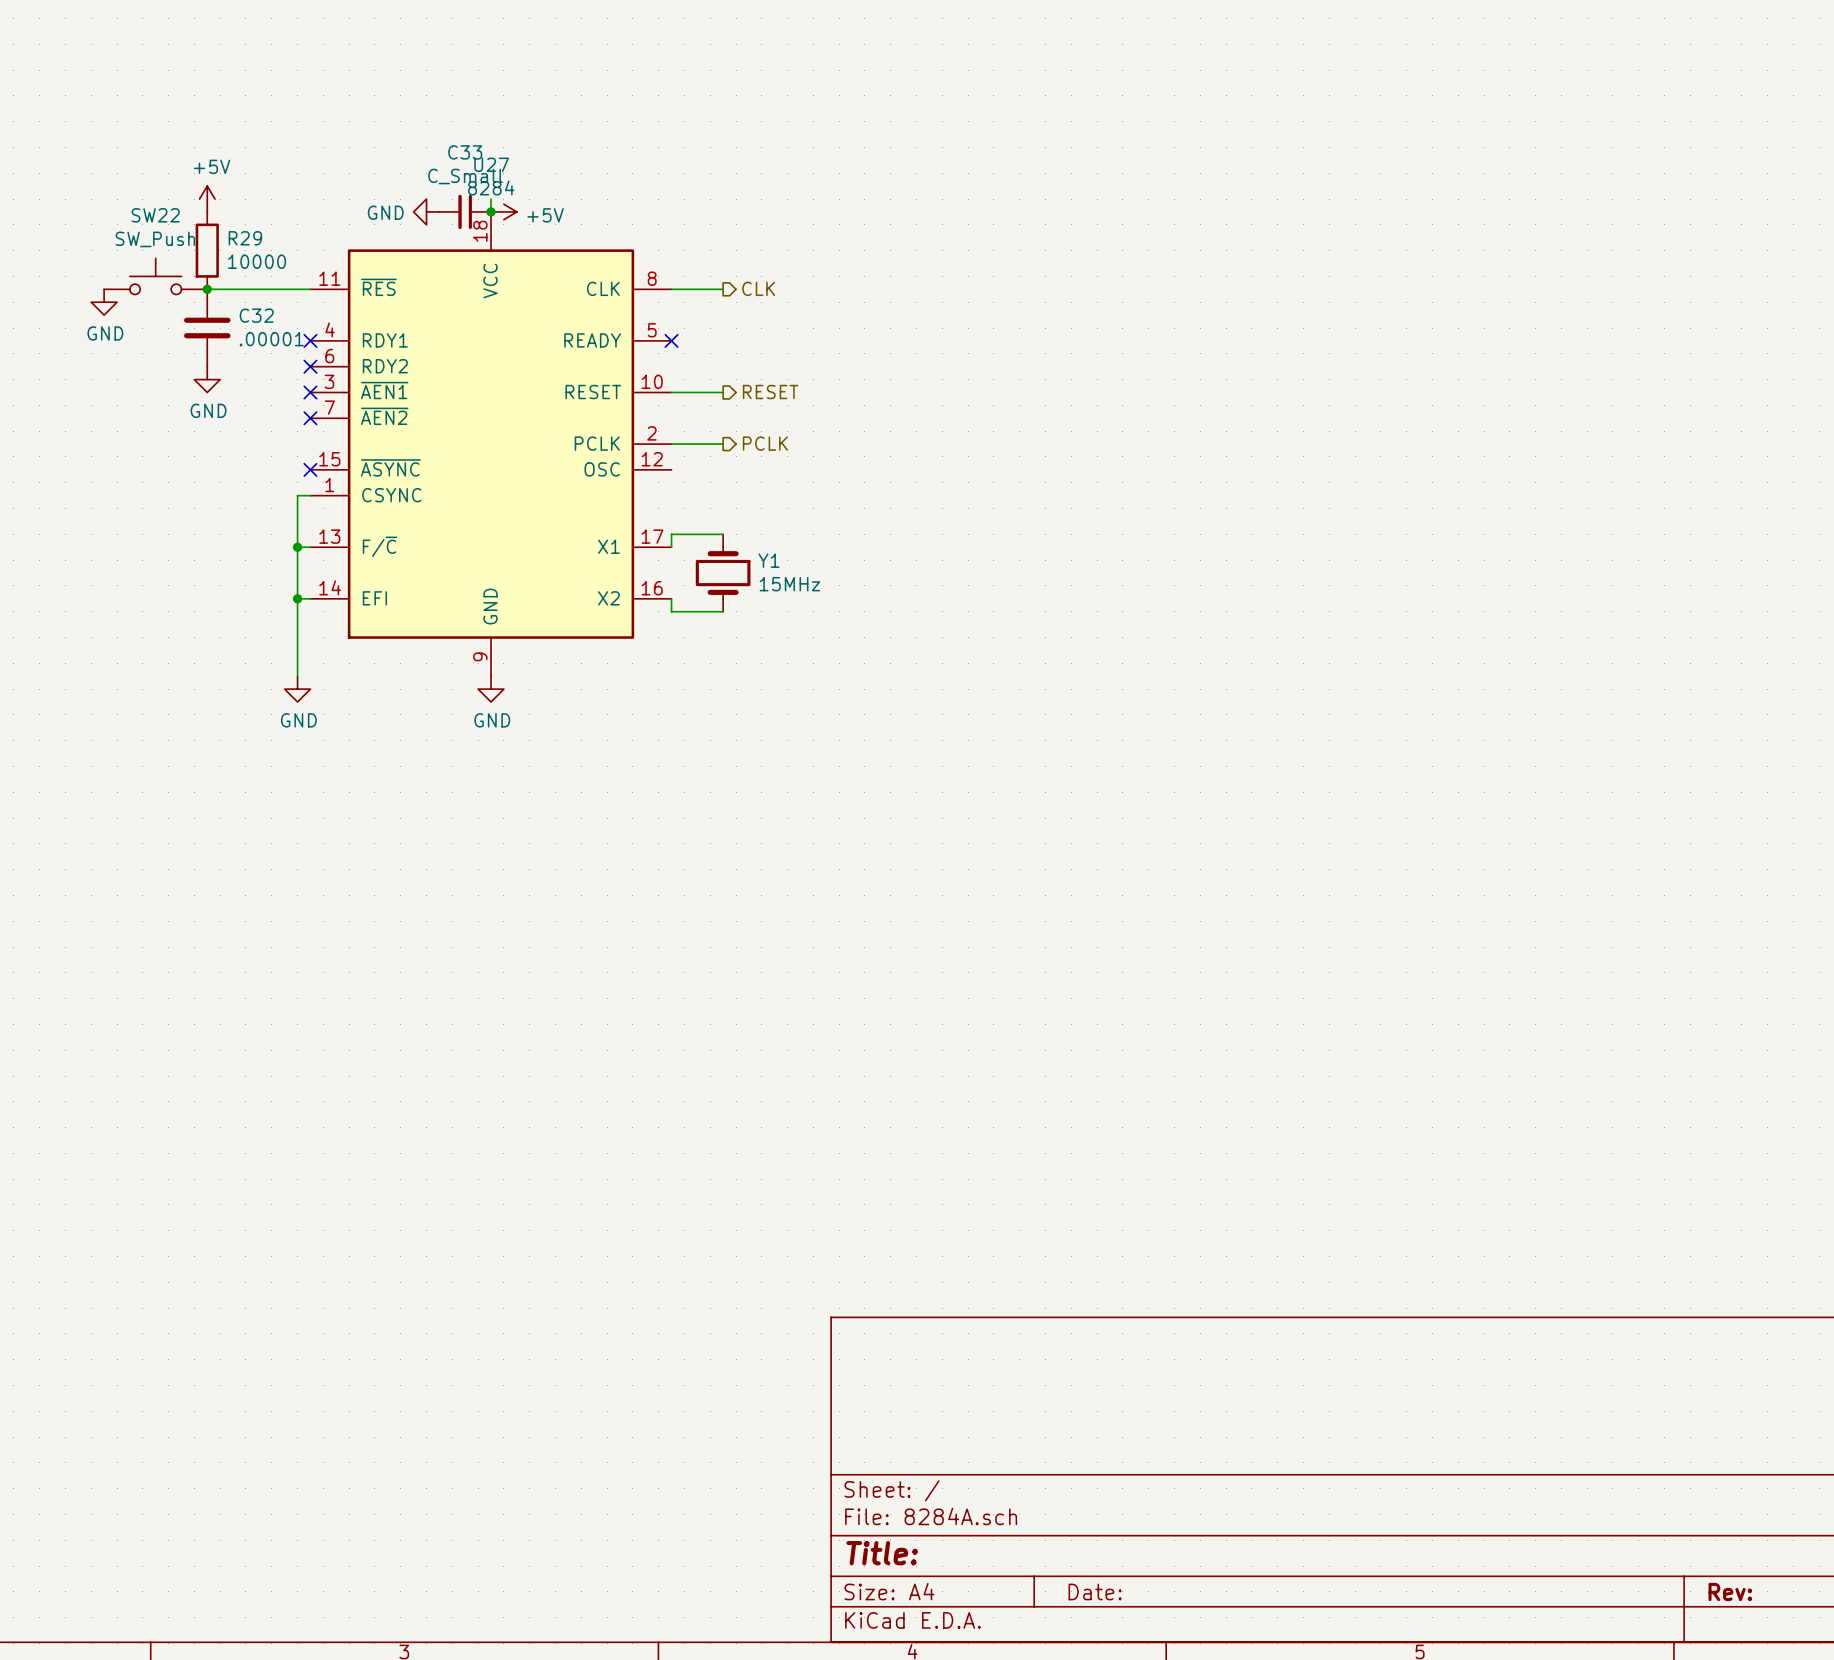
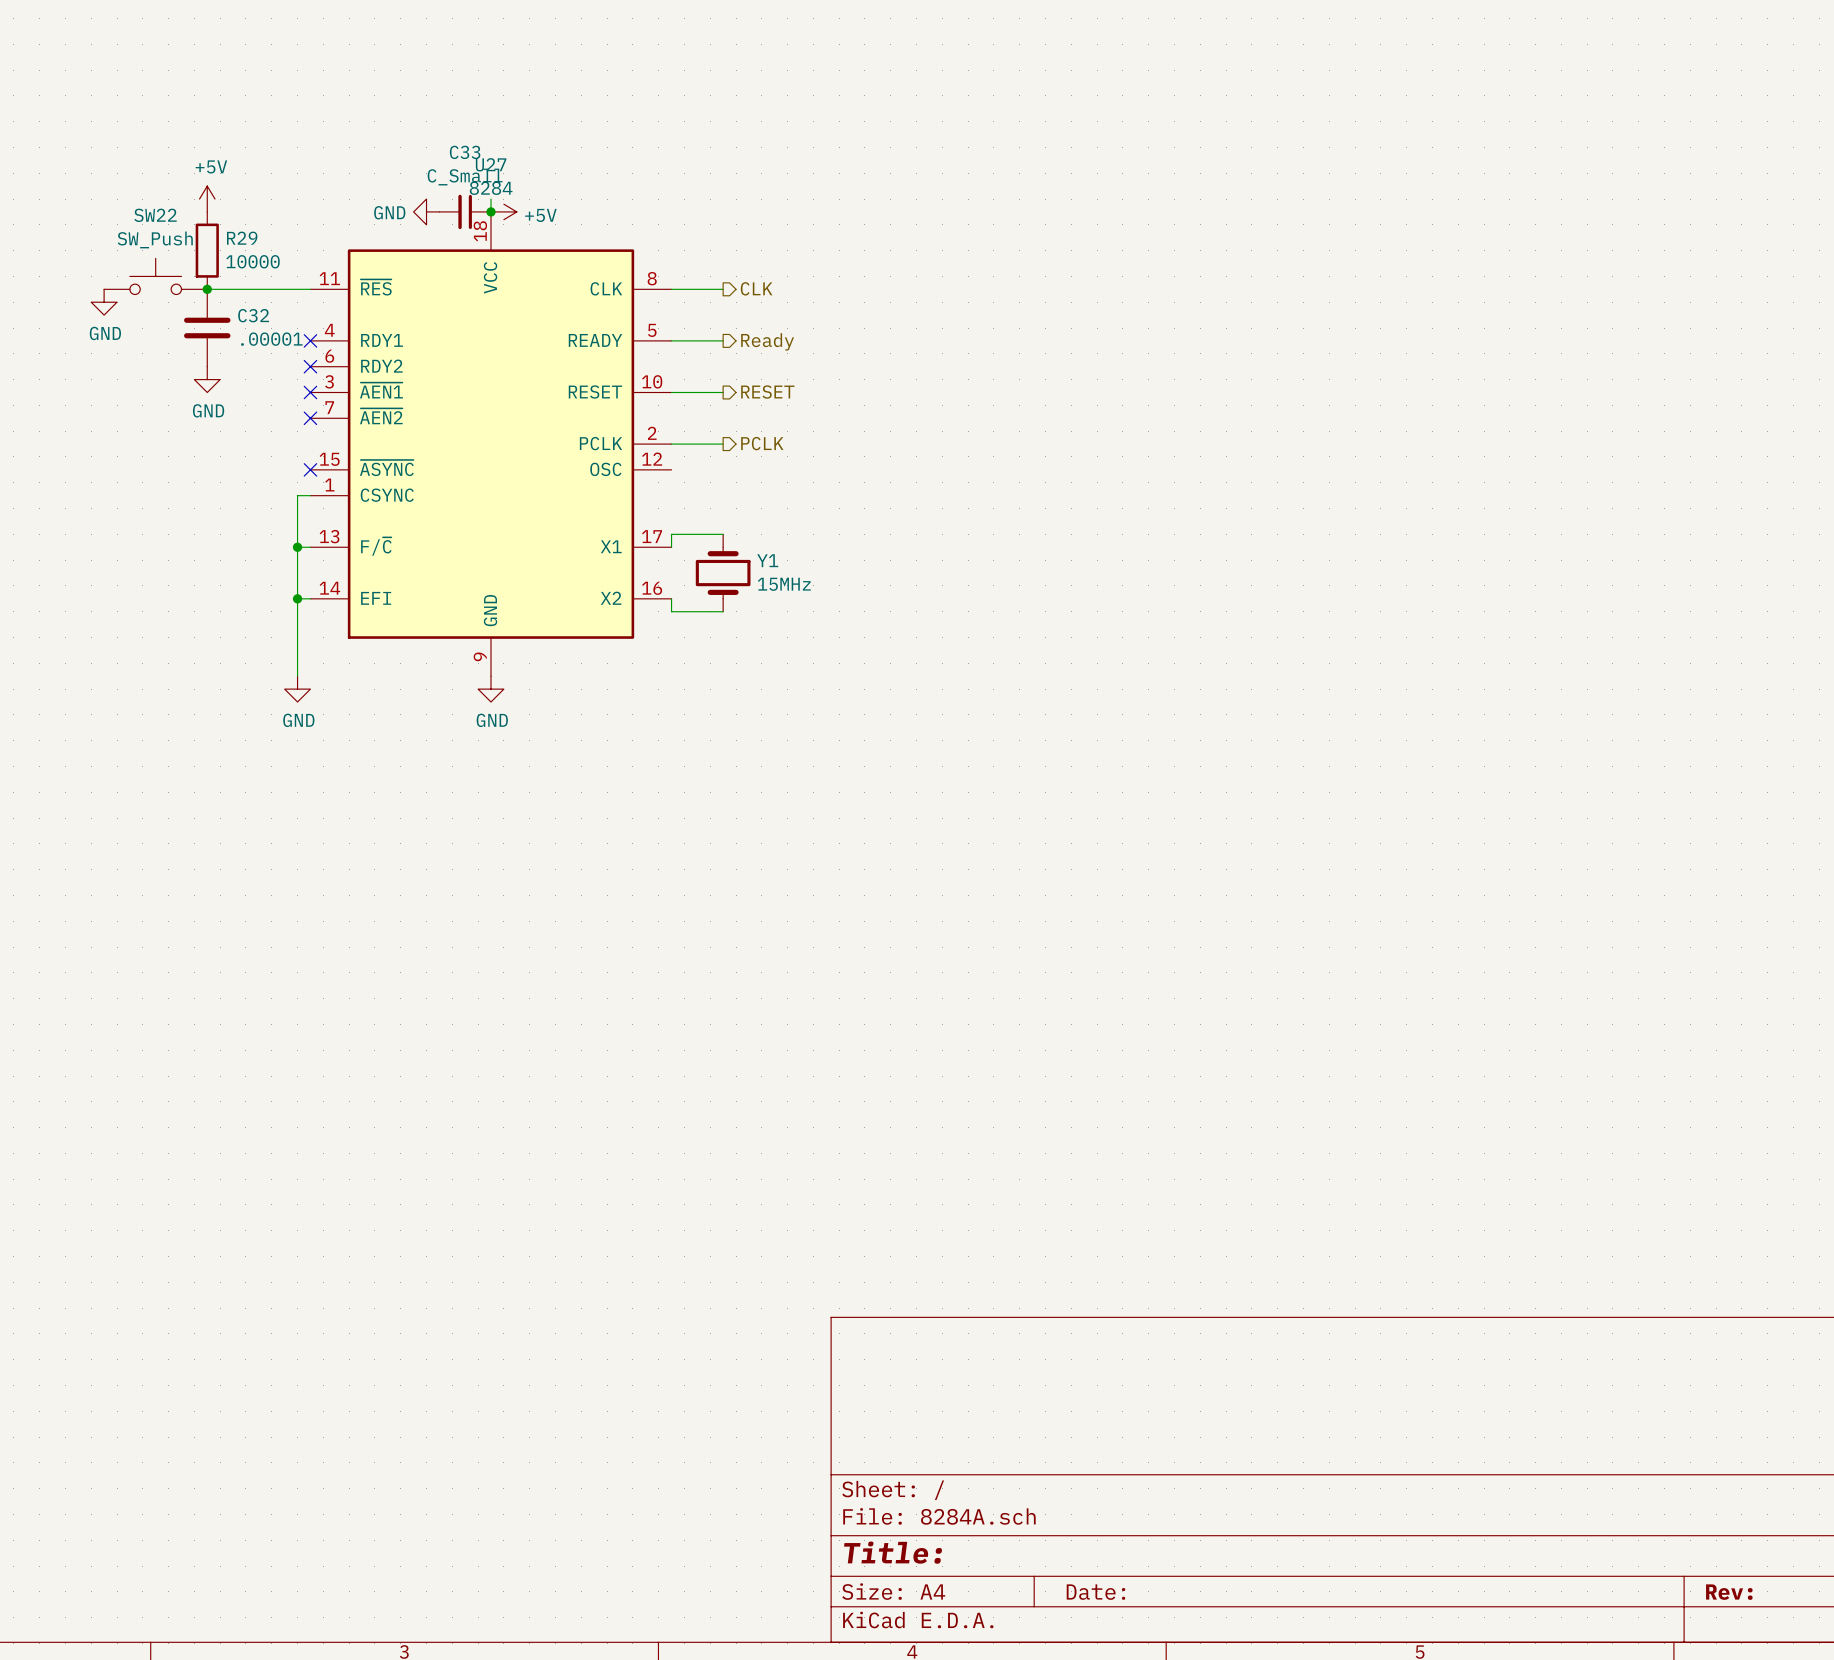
wire: none -> (671, 340) (723, 340)
no-connect mark: (671, 340) -> none
hierarchical label: none -> Ready (767, 341)

